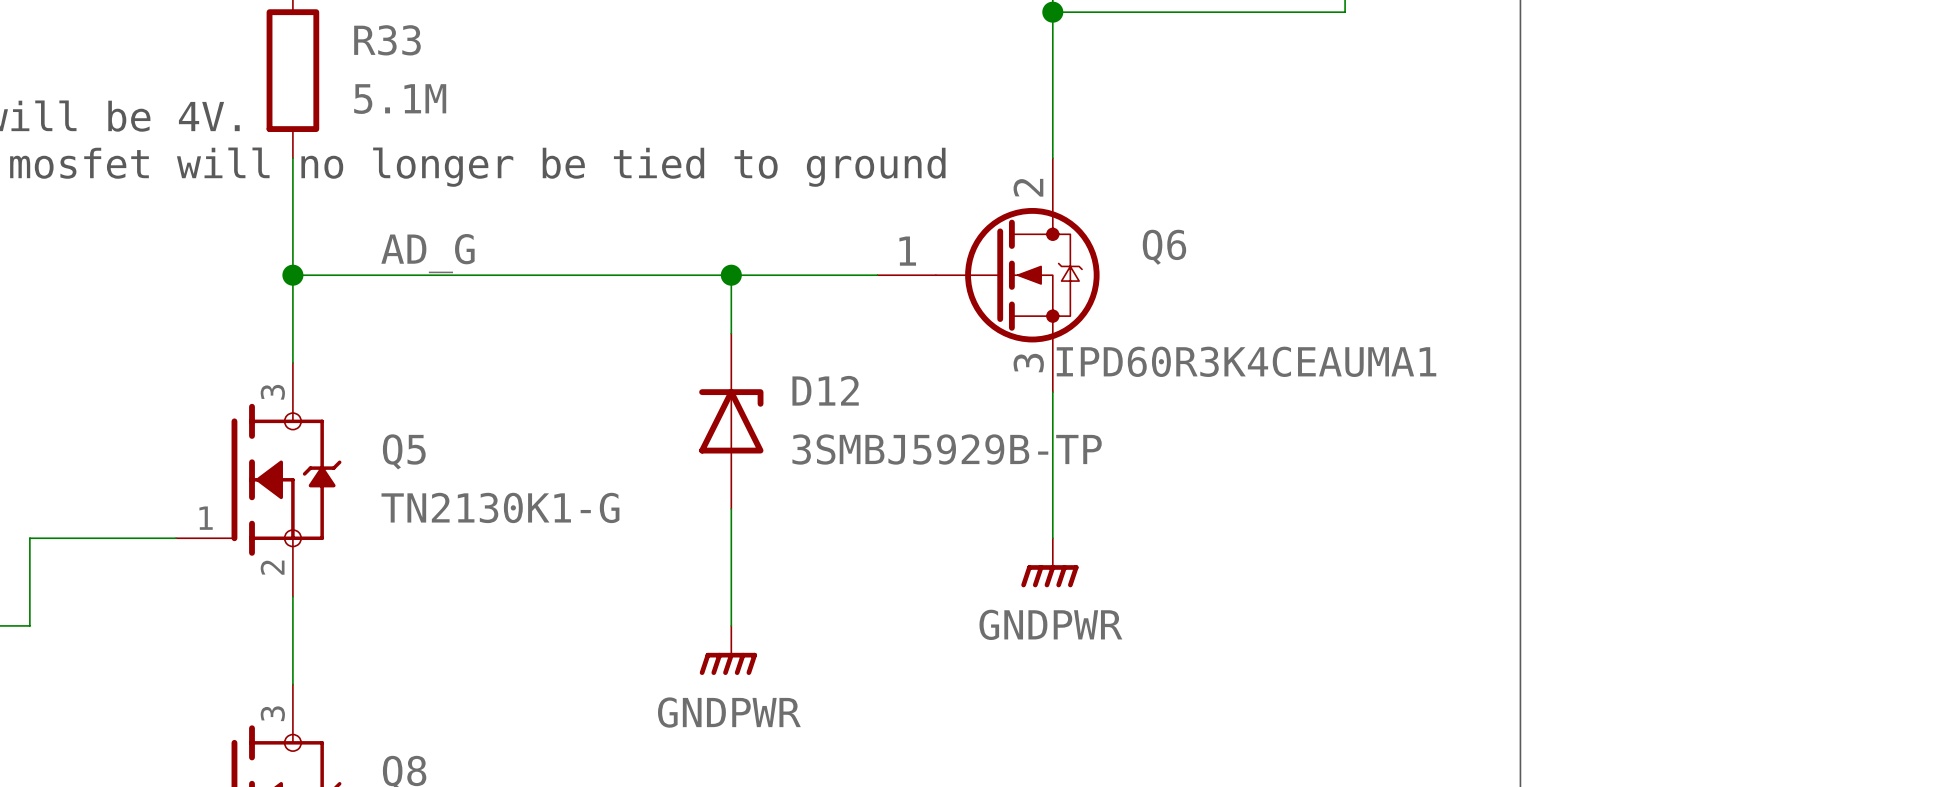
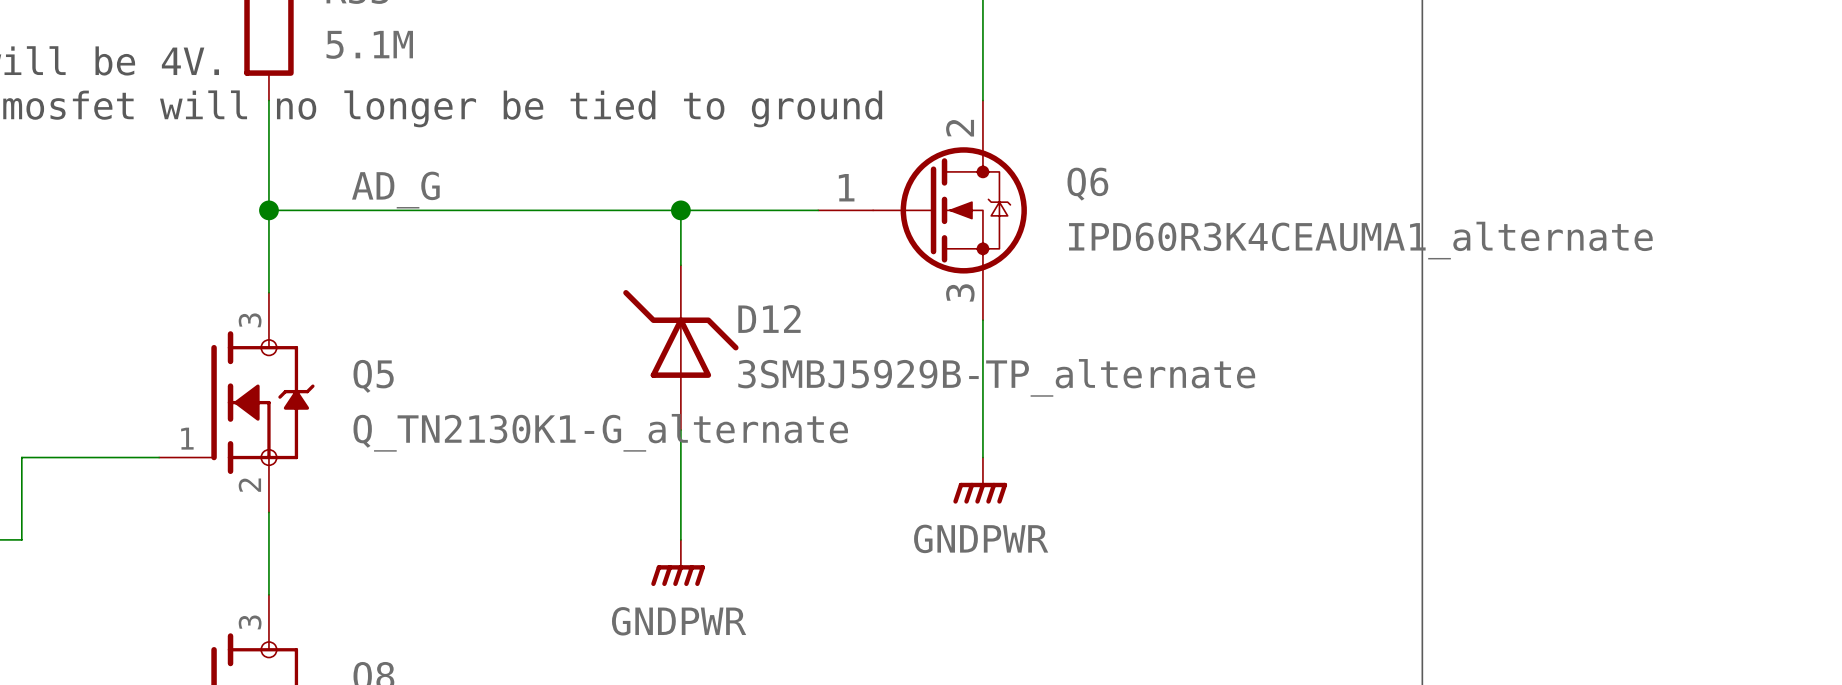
D12 symbol: [699, 333, 764, 510] -> [623, 265, 739, 431]
Q6 value: IPD60R3K4CEAUMA1 (1246, 361) -> IPD60R3K4CEAUMA1_alternate (1360, 240)
D12 value: 3SMBJ5929B-TP (947, 449) -> 3SMBJ5929B-TP_alternate (996, 377)
Q5 value: TN2130K1-G (500, 507) -> Q_TN2130K1-G_alternate (600, 432)

